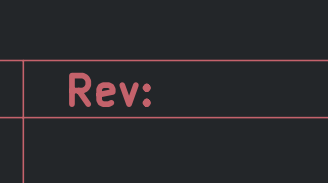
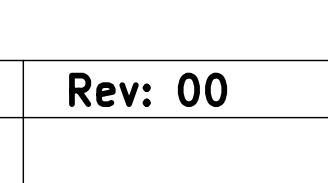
title block: Rev: (110, 89) -> Rev: 00 (148, 89)

